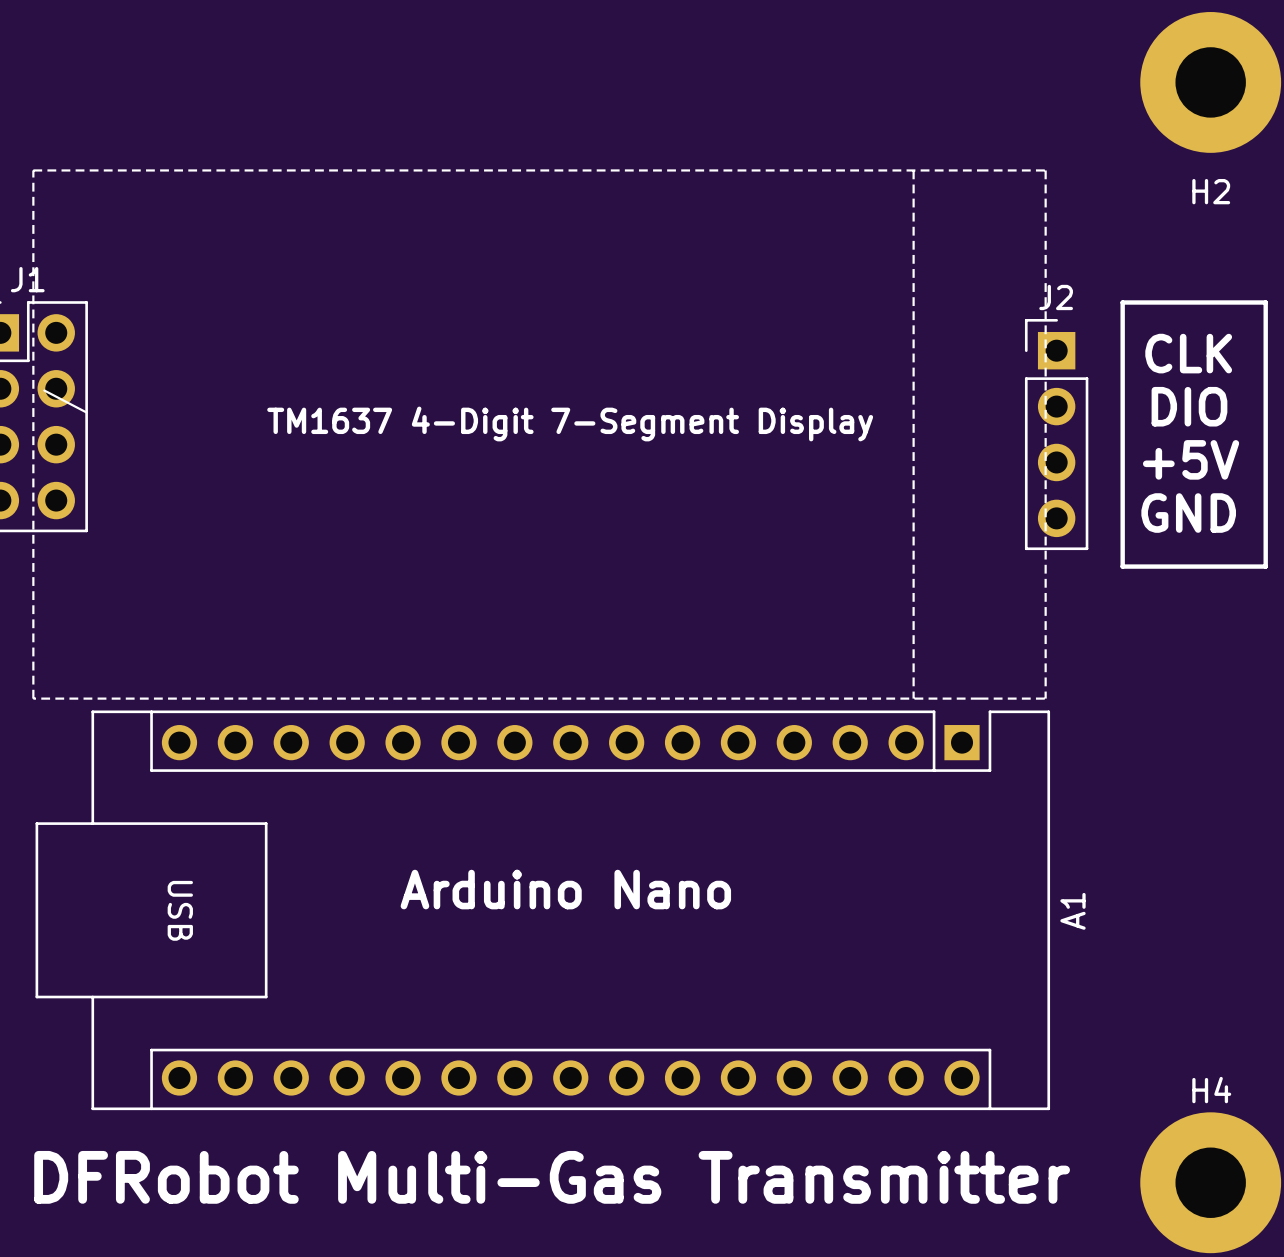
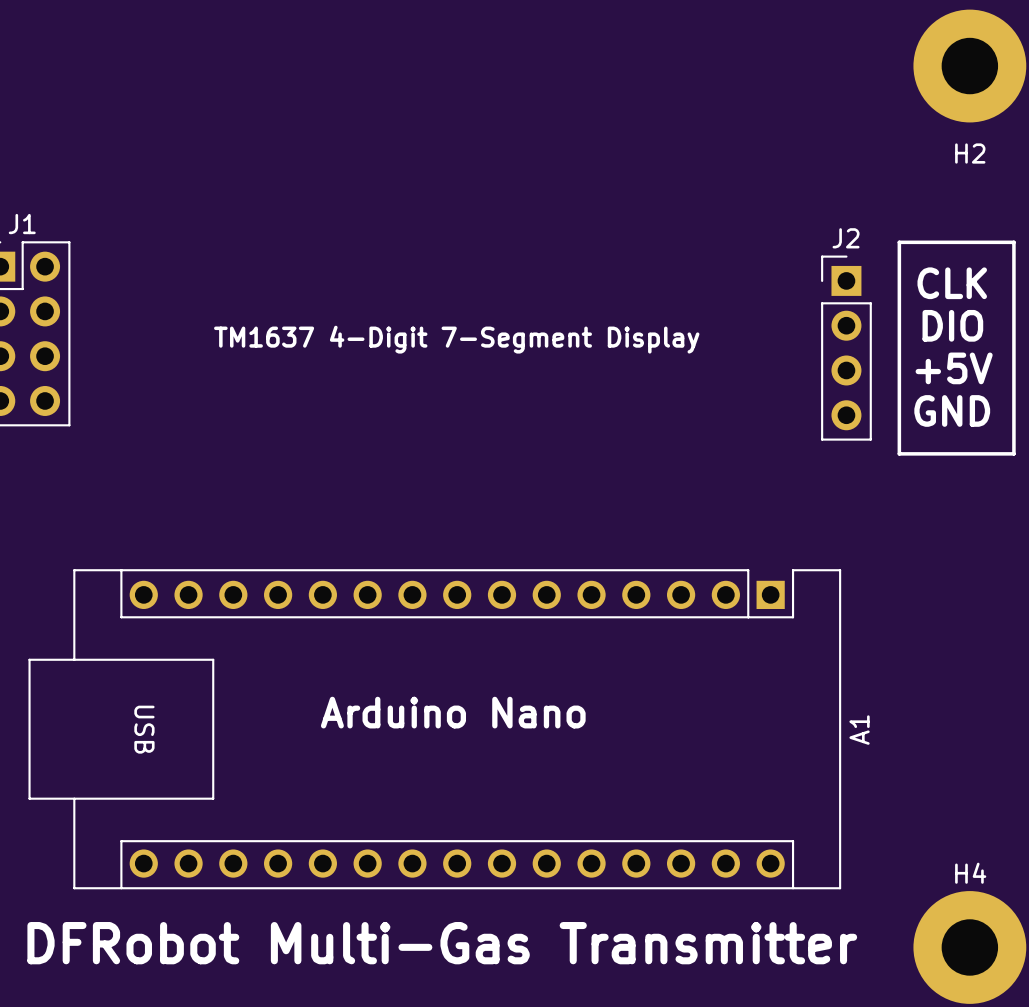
line: (33, 170) (1045, 170) (1045, 698) (33, 698) (33, 170) -> none
line: (913, 170) (913, 698) -> none
line: (44, 390) (86, 412) -> none

